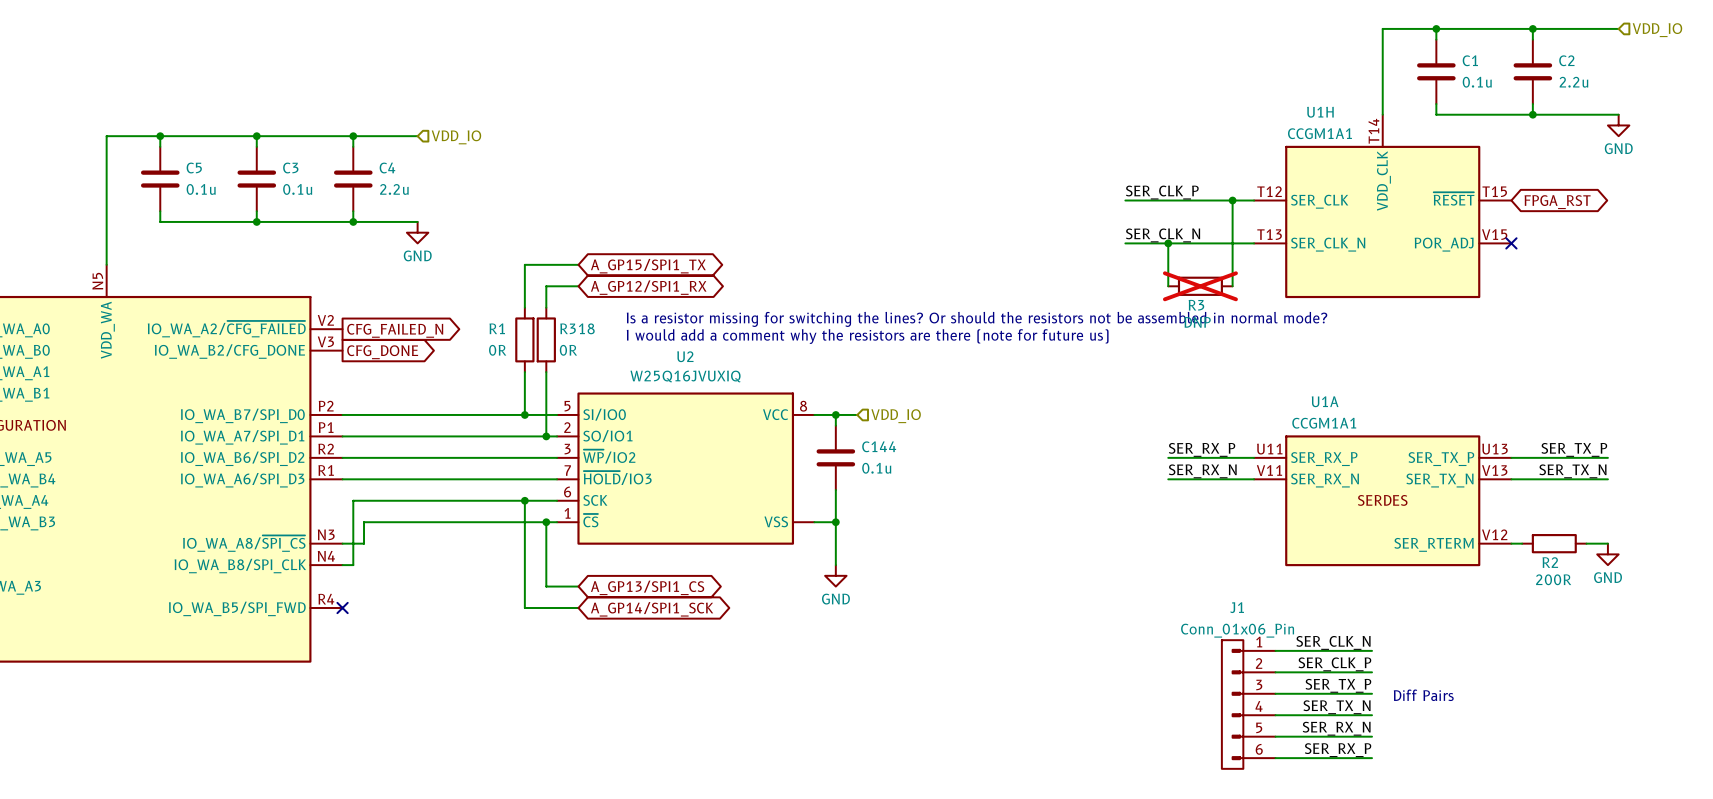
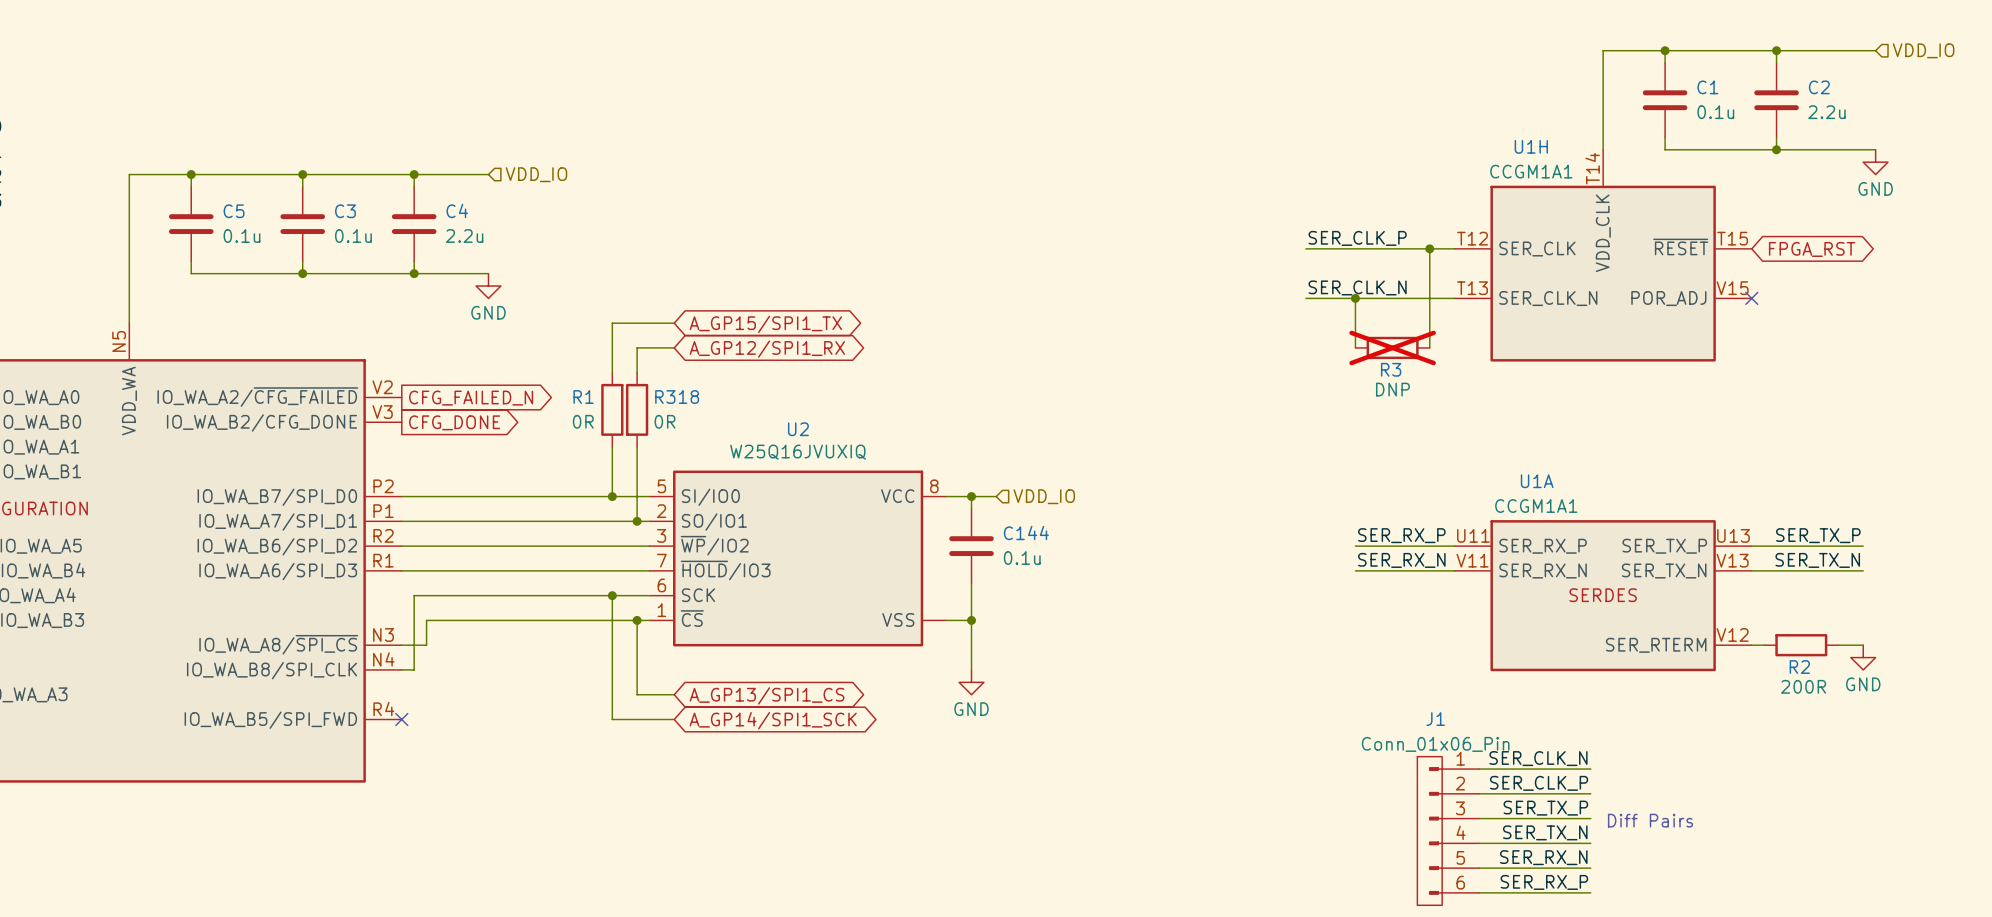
text: Is a resistor missing for switching the lines? Or should the resistors not be assembled in normal mode? (977, 319) -> none
text: I would add a comment why the resistors are there (note for future us) (867, 336) -> none

